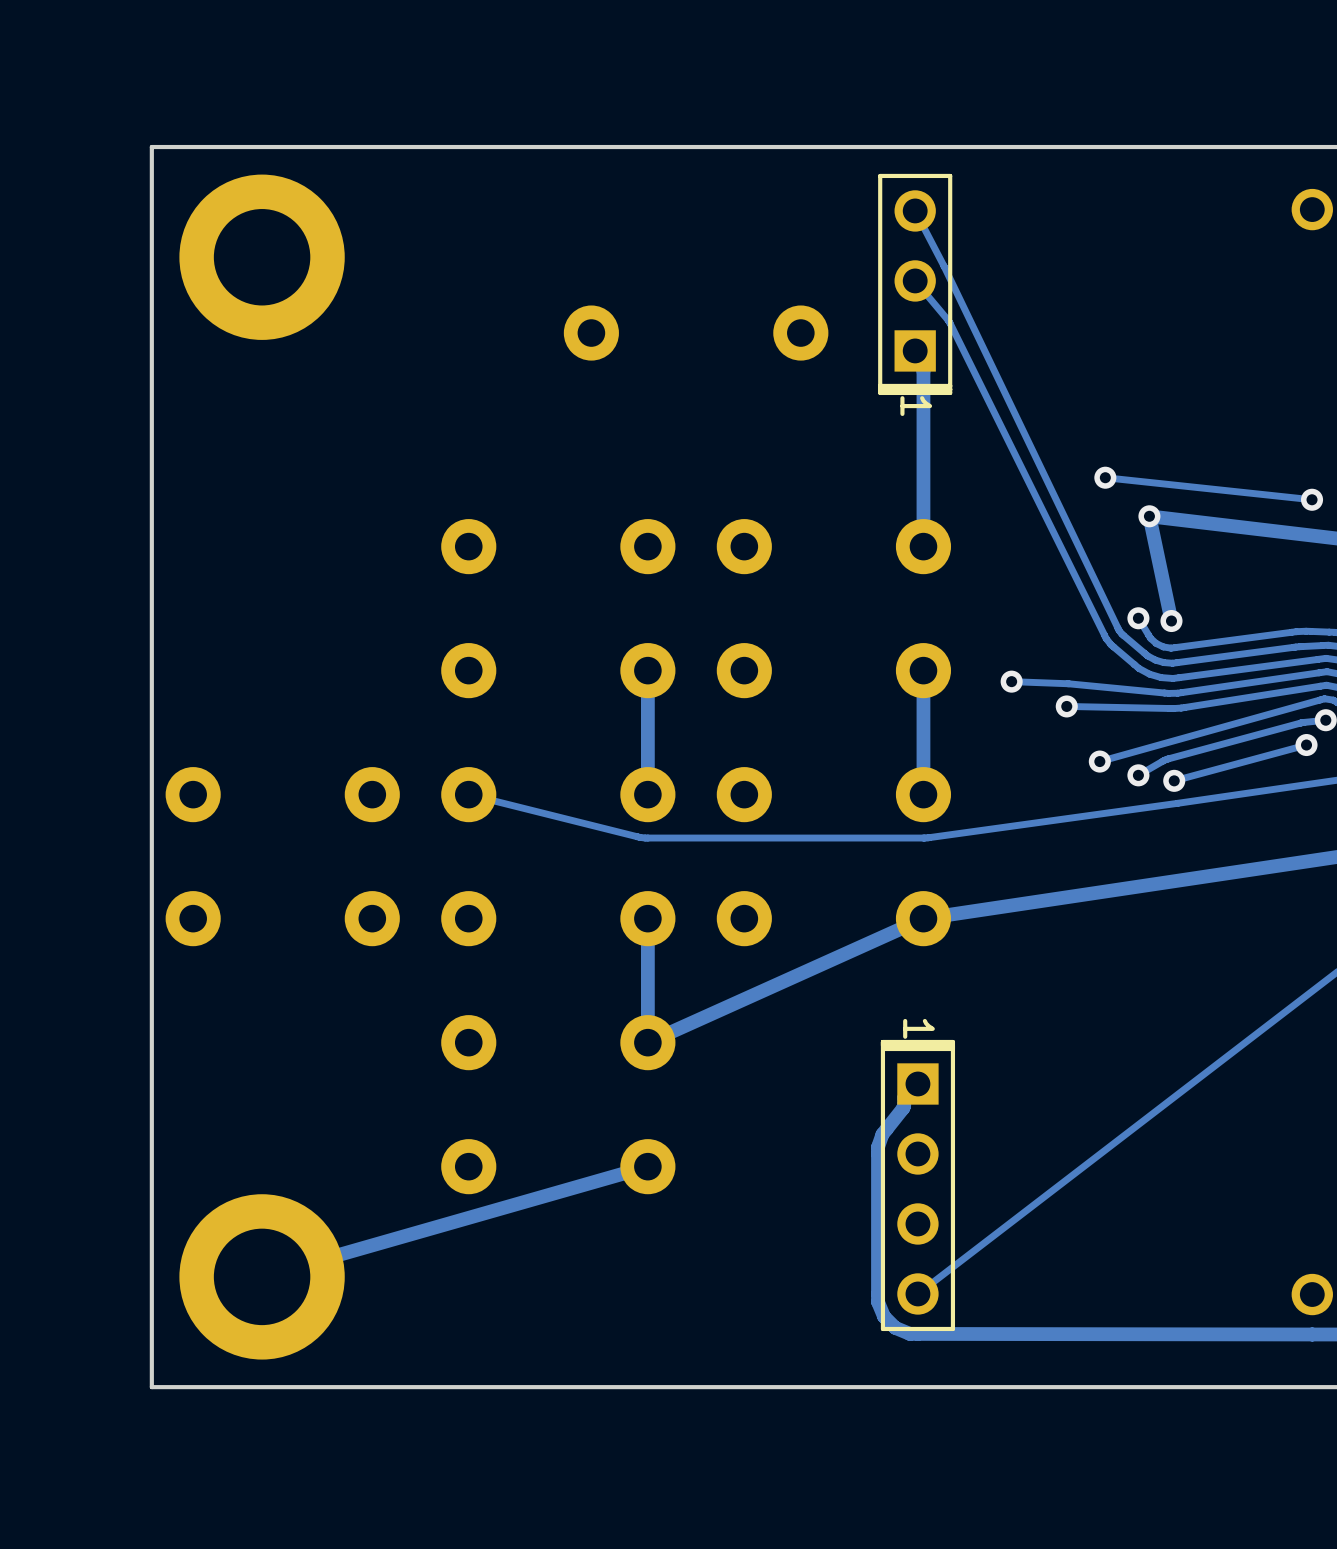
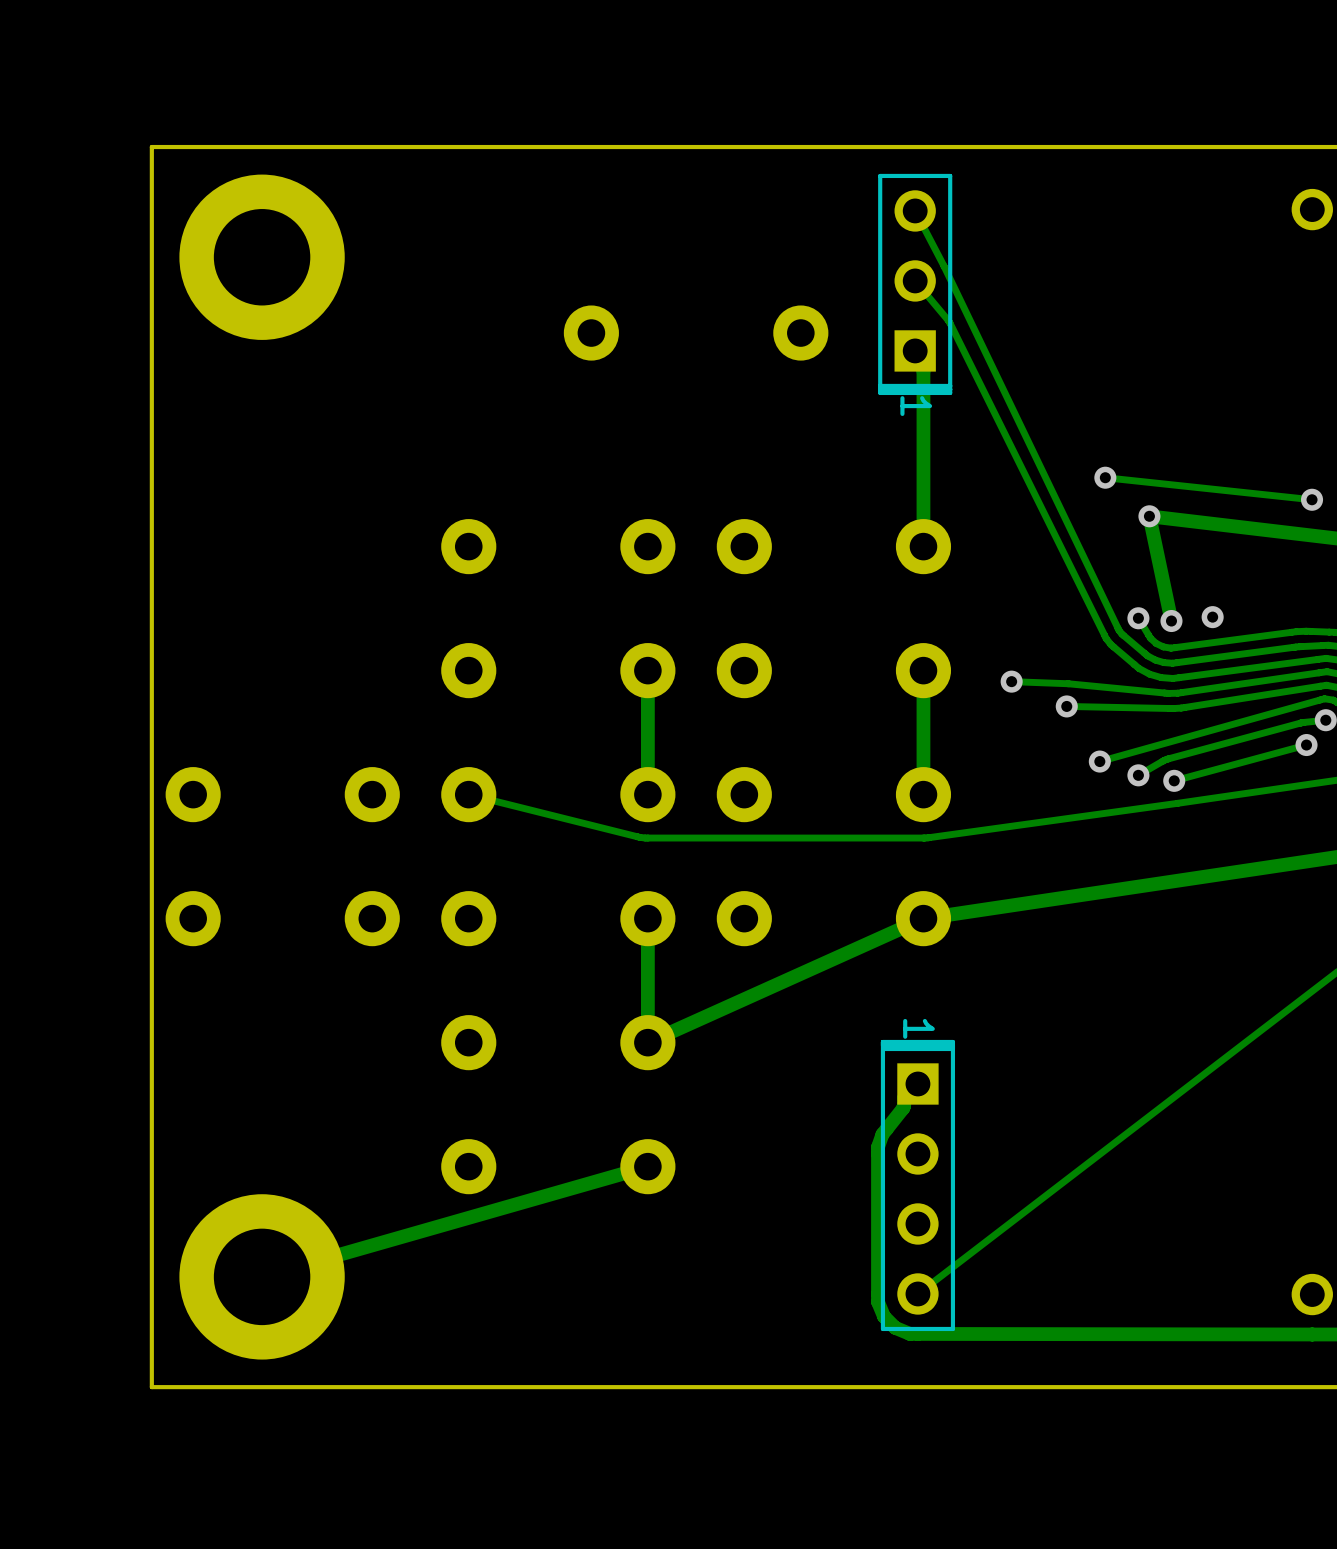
via: none -> (1212, 617)

